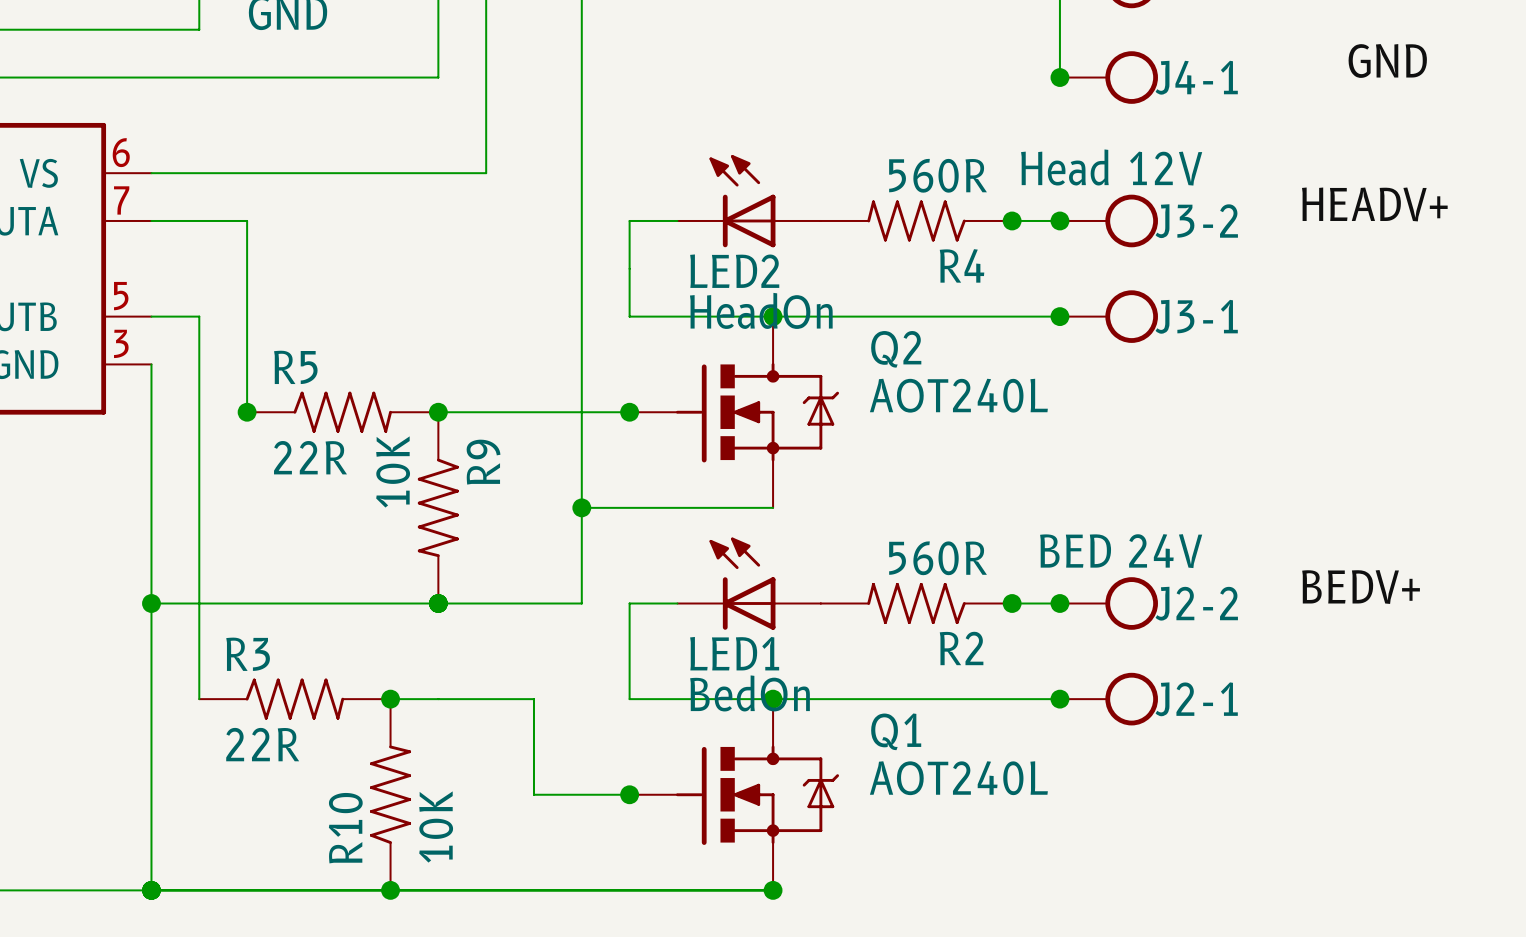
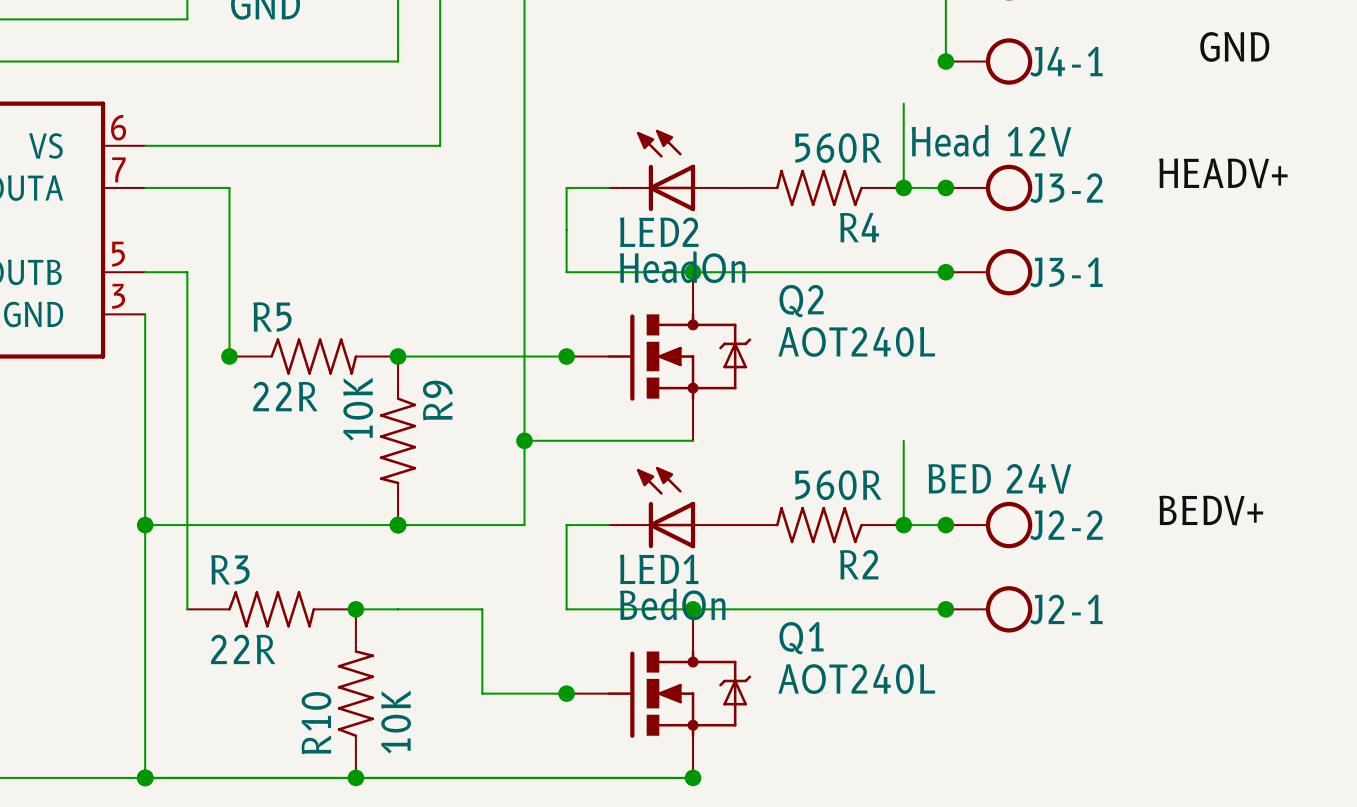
wire: none -> (903, 103) (903, 187)
wire: none -> (903, 440) (903, 525)

